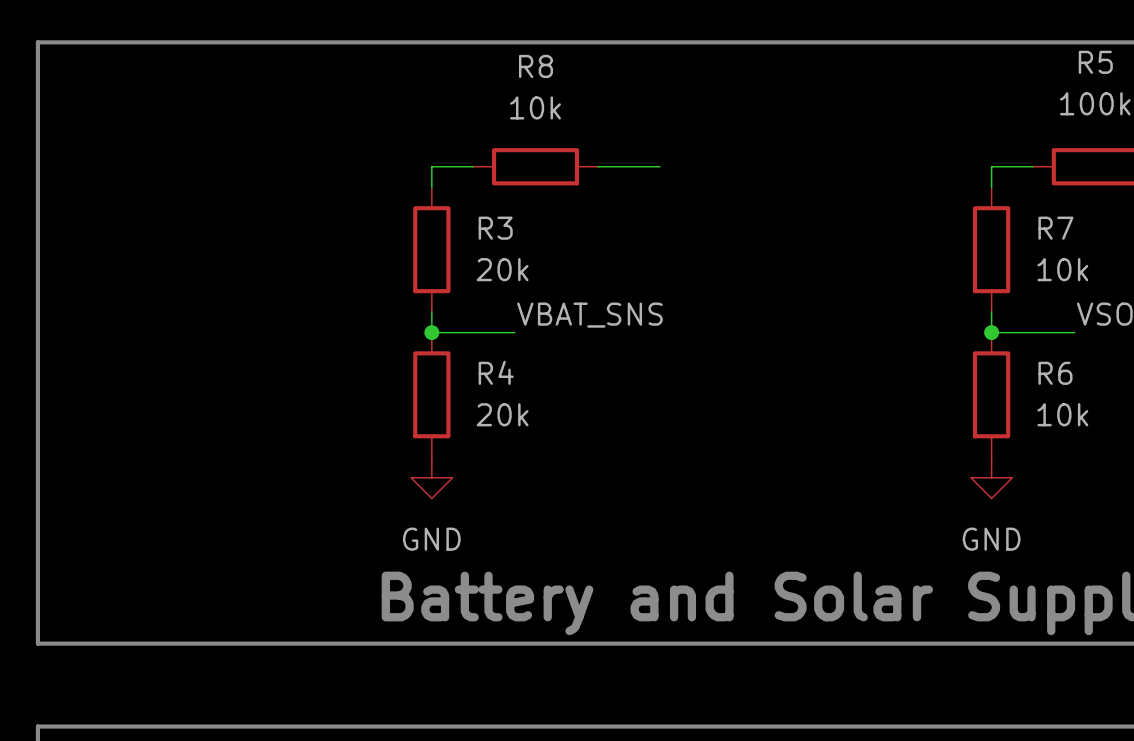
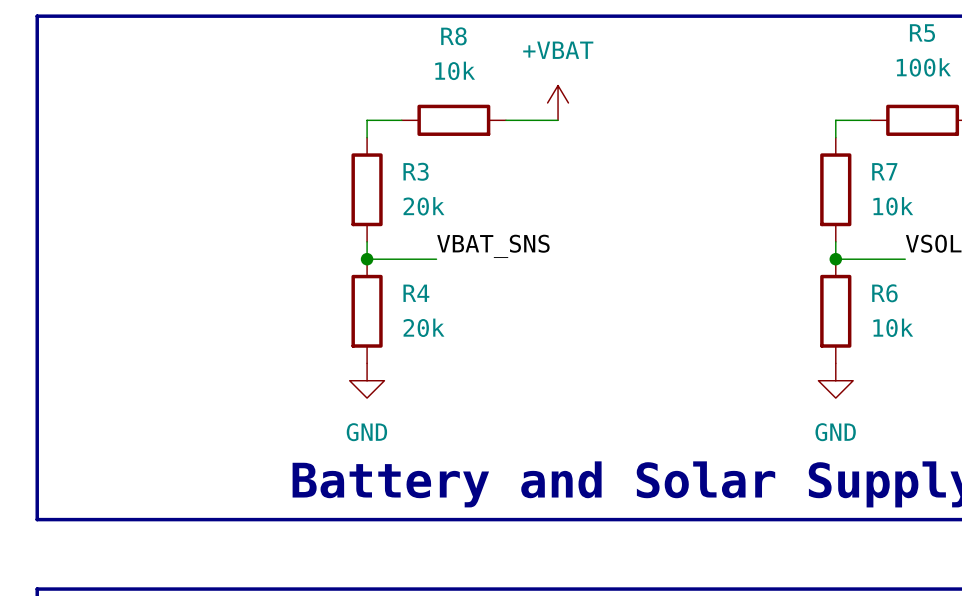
power symbol: none -> +VBAT (558, 102)

